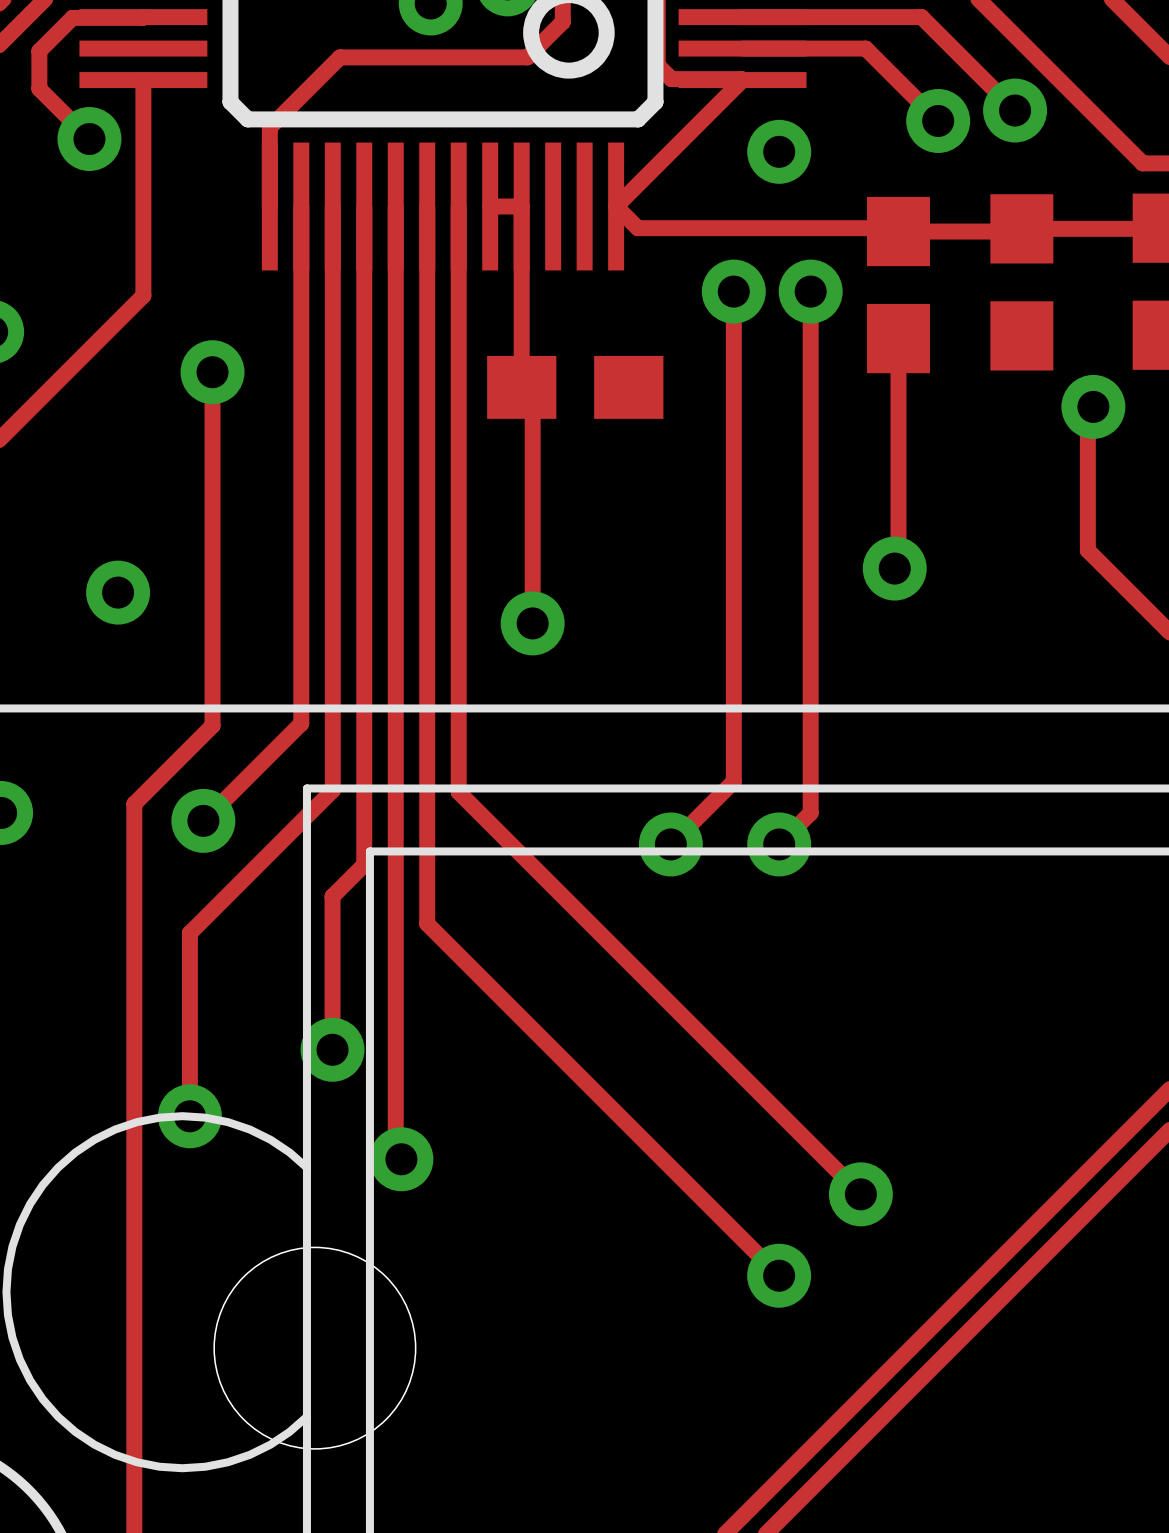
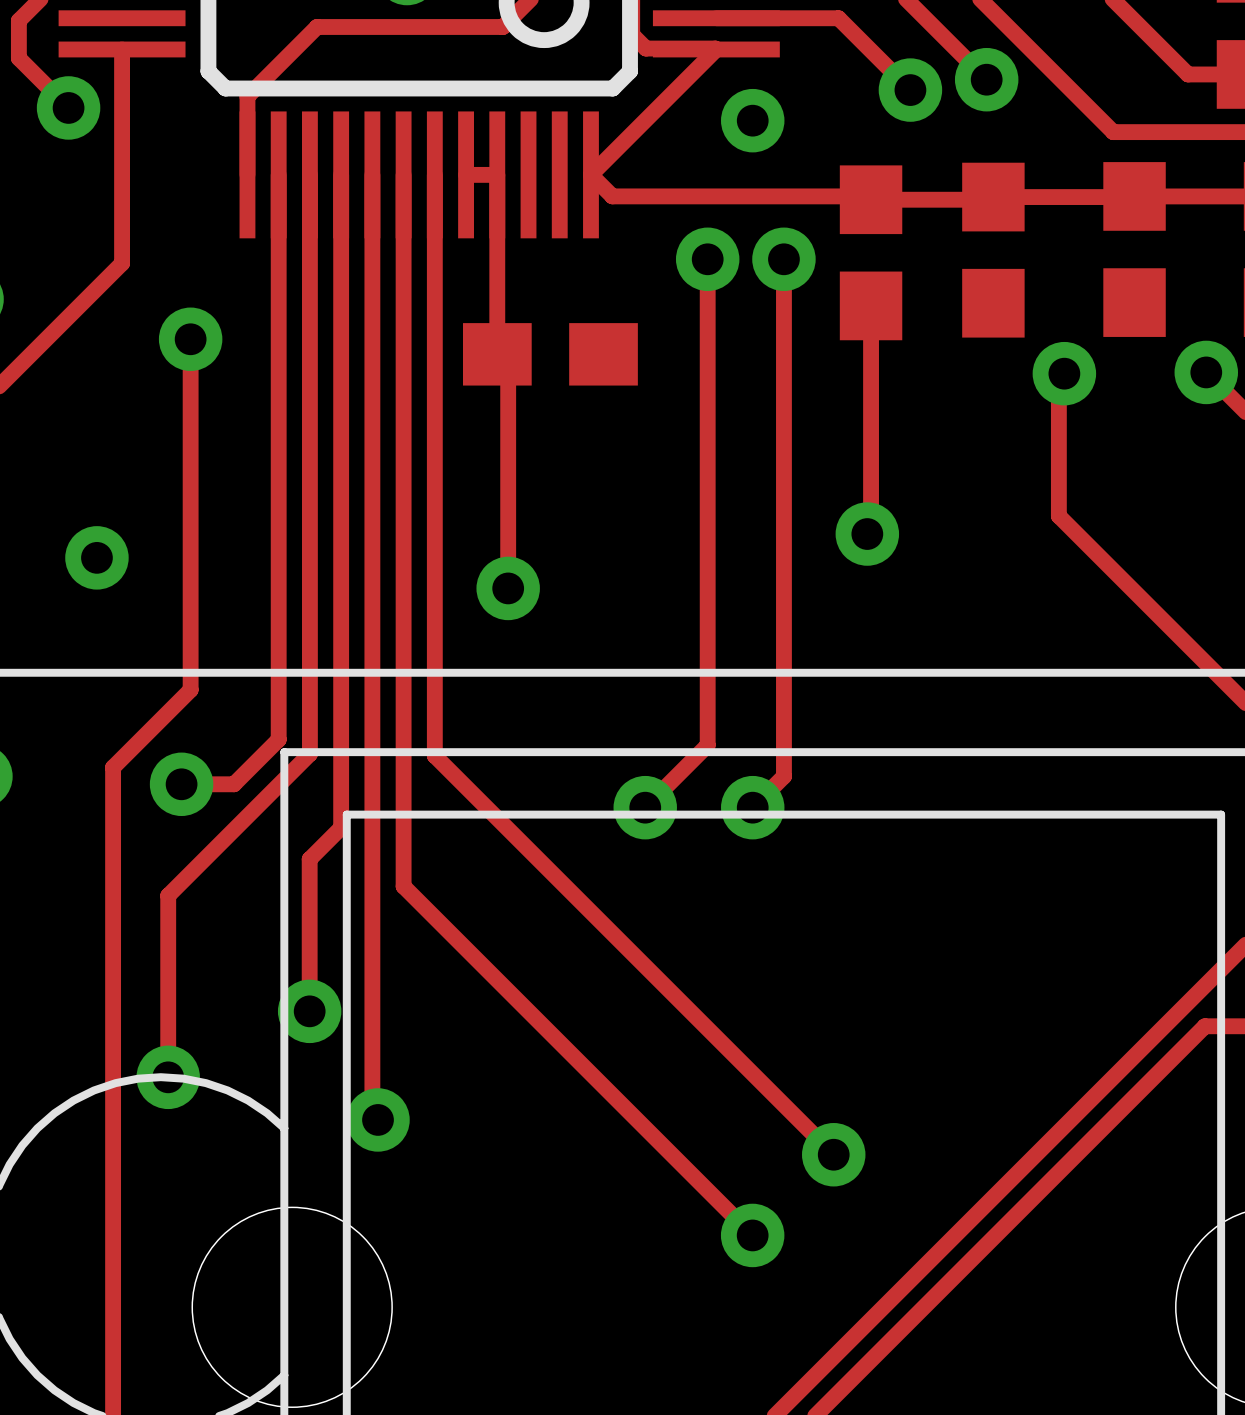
track: (301, 723) (203, 820) -> (278, 687) (278, 739) (234, 784) (182, 784)

